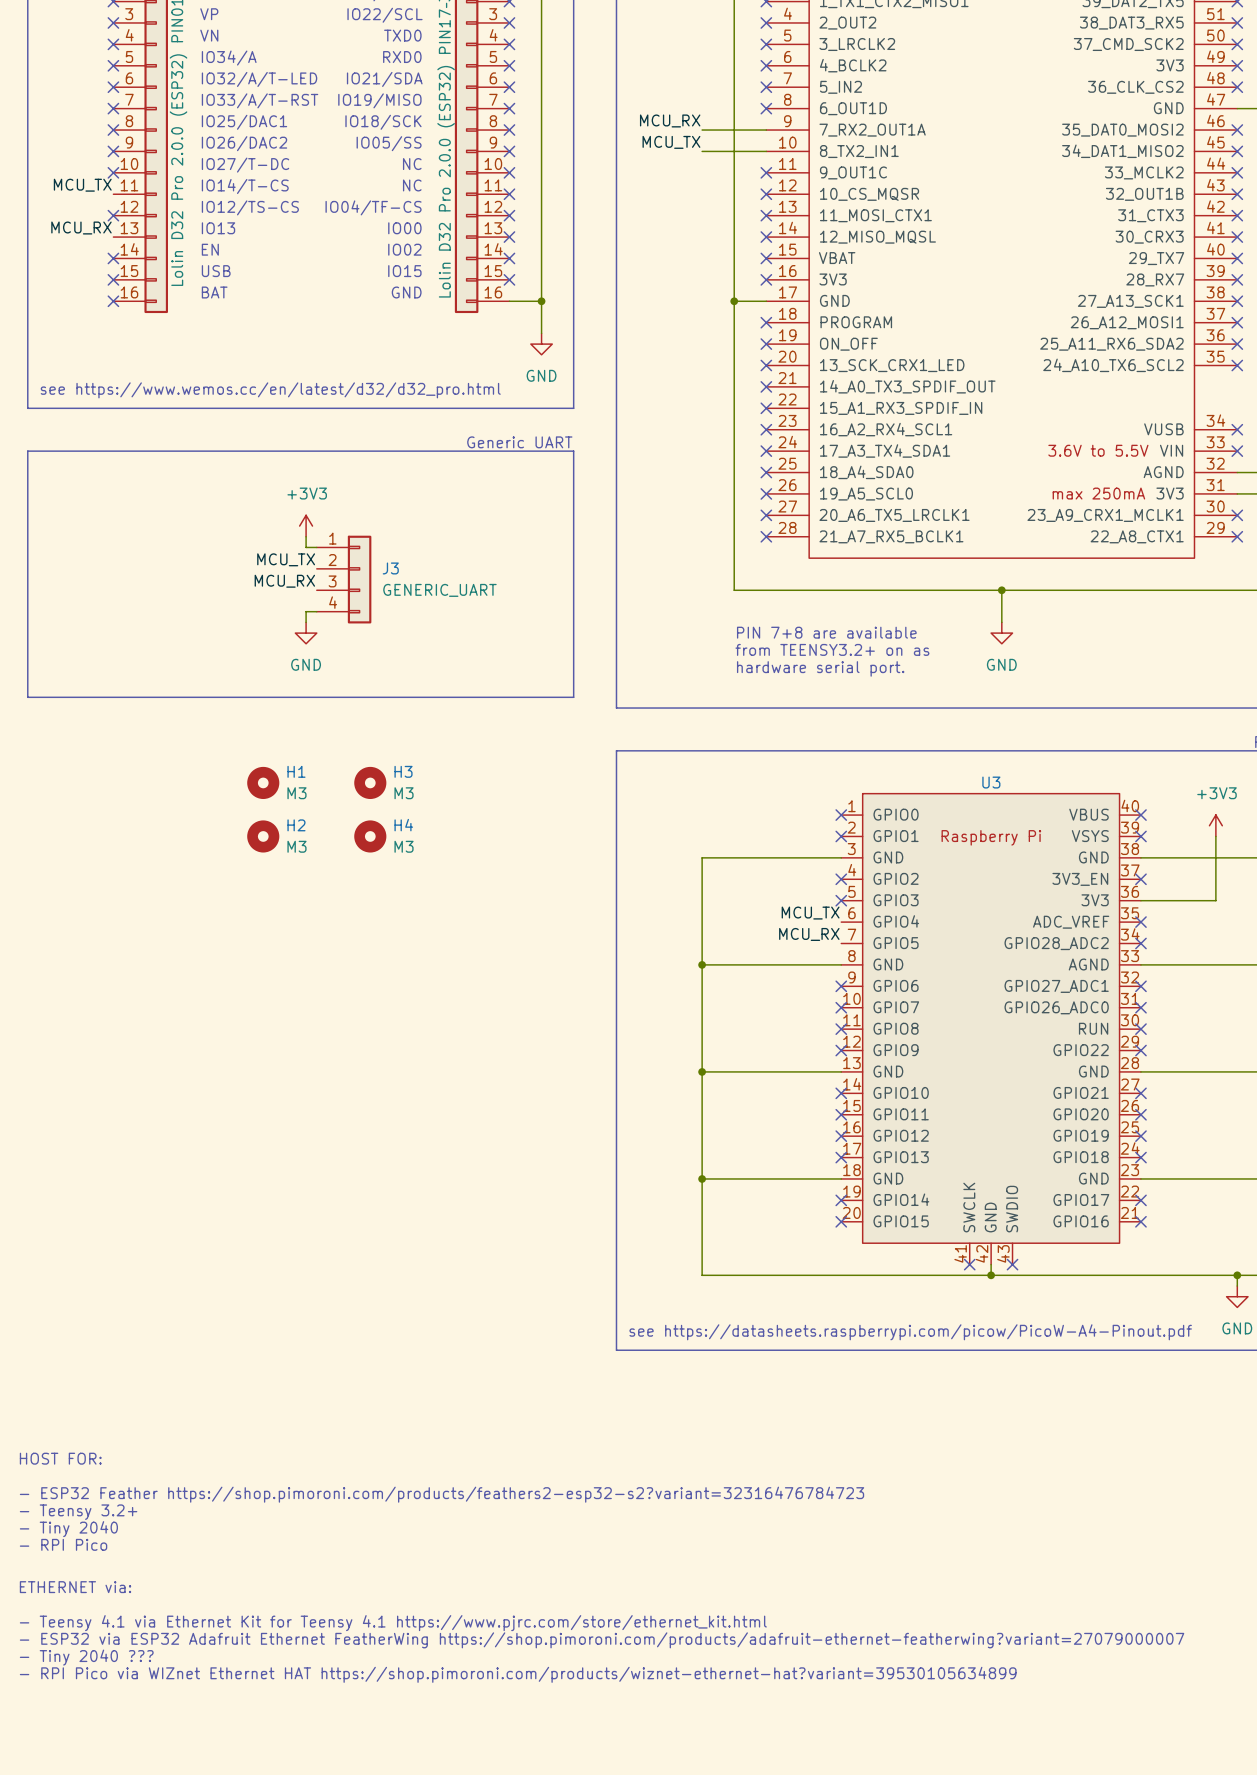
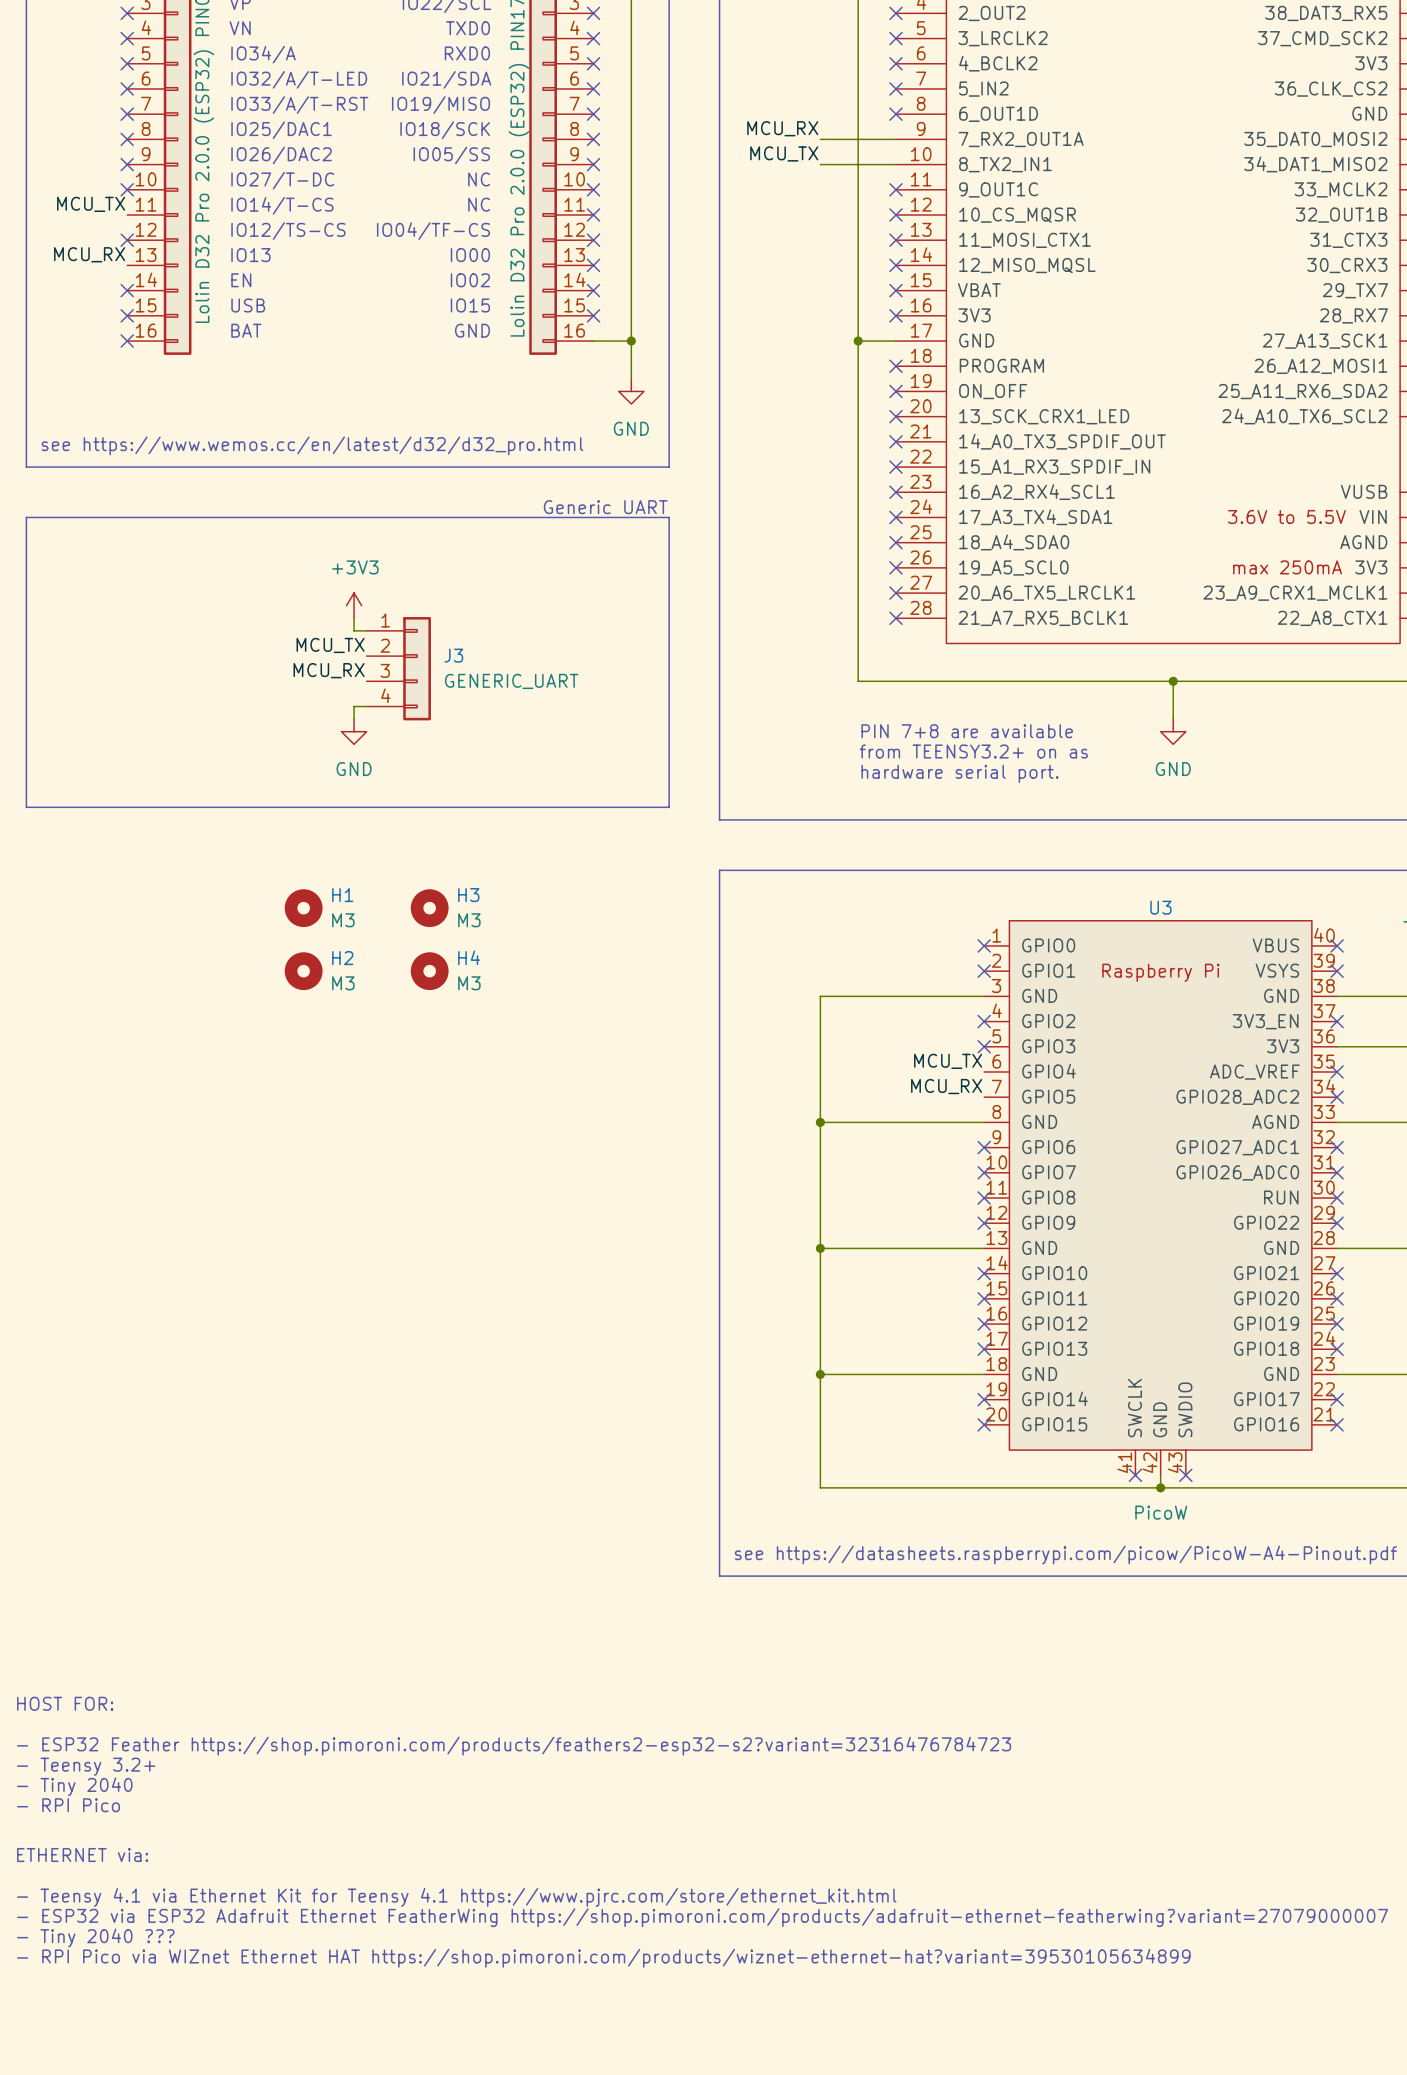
U3 value: none -> PicoW (1161, 1512)

